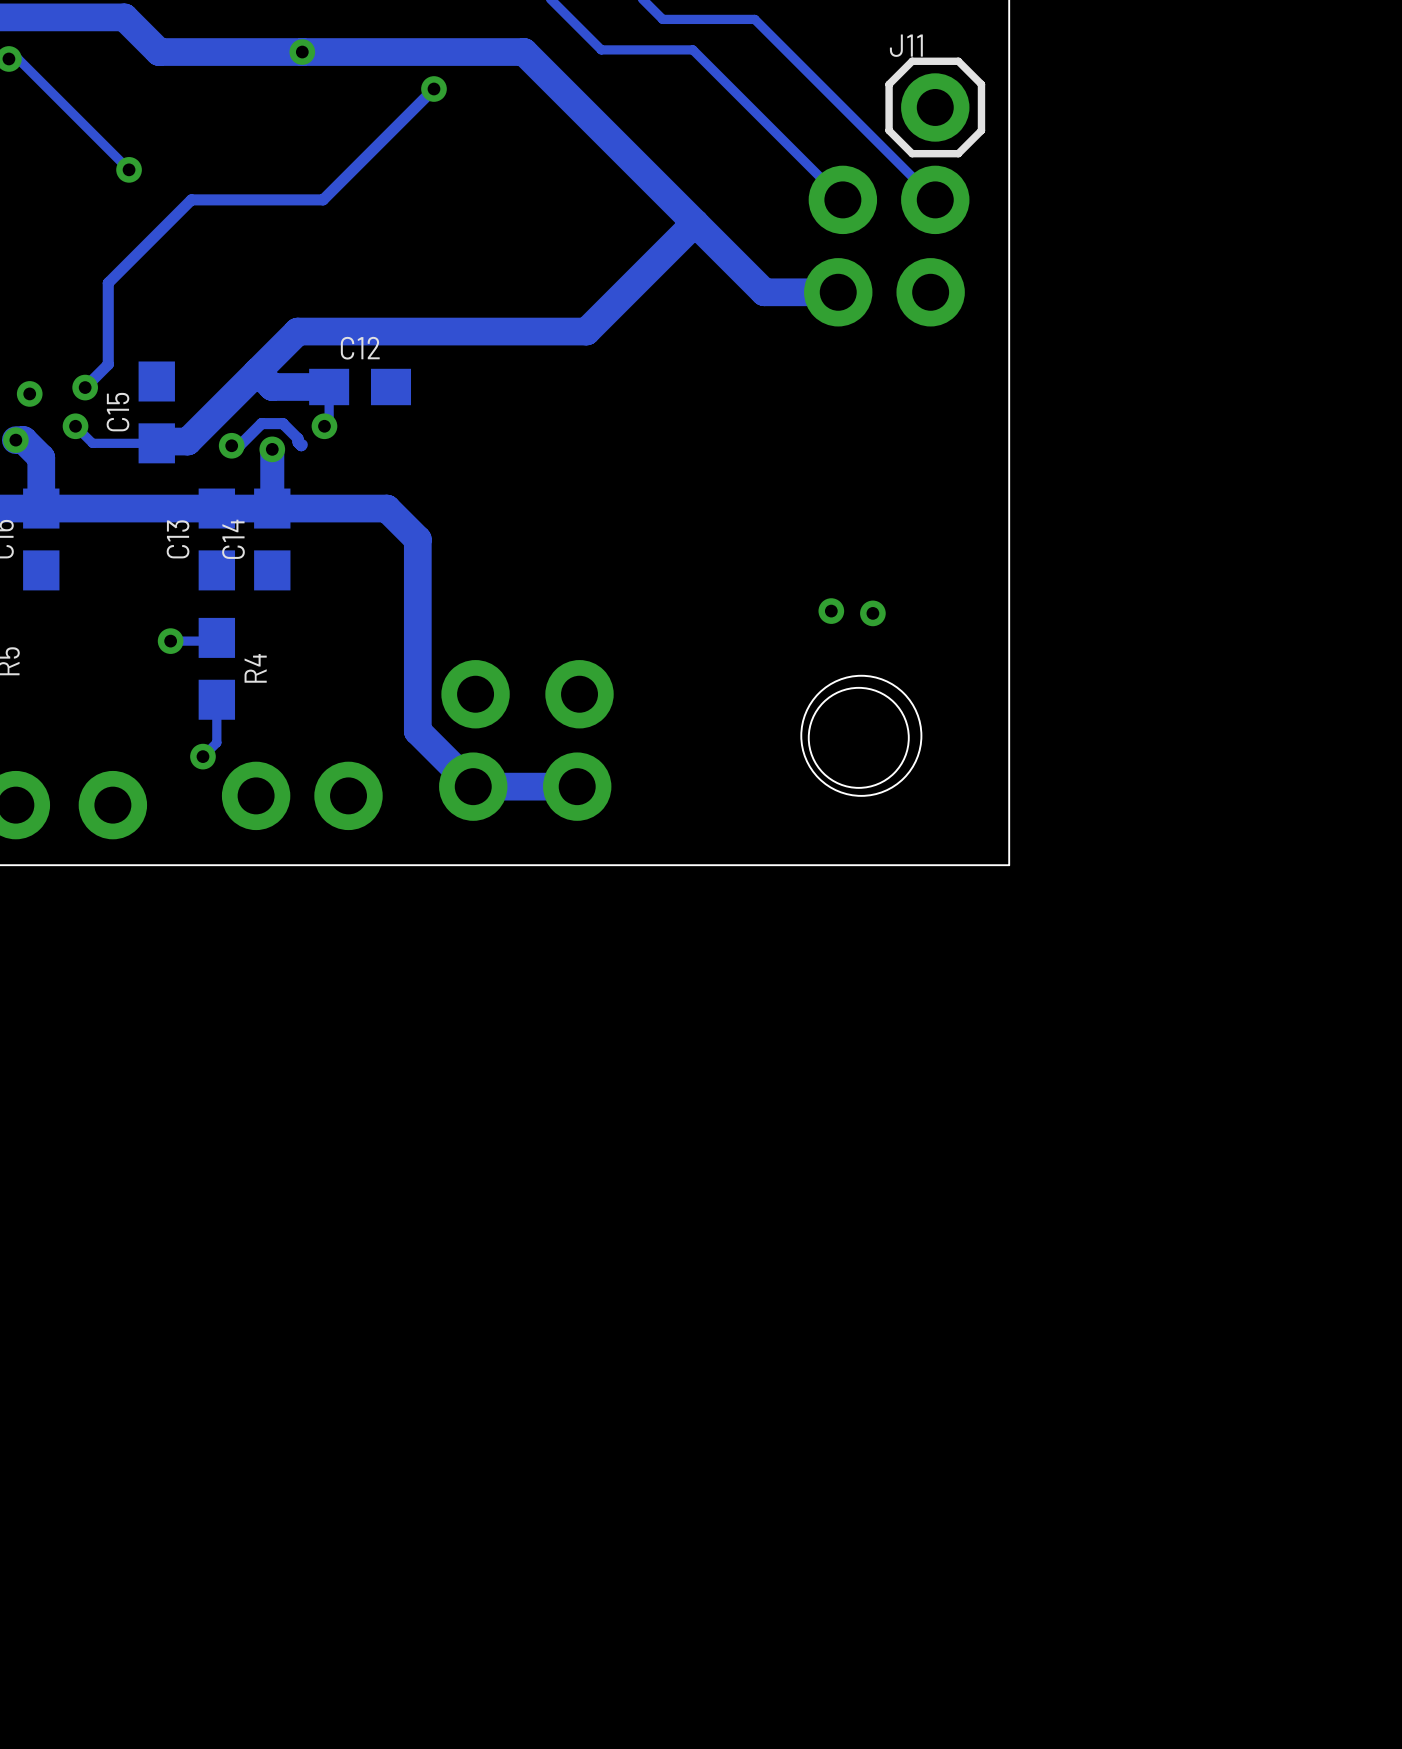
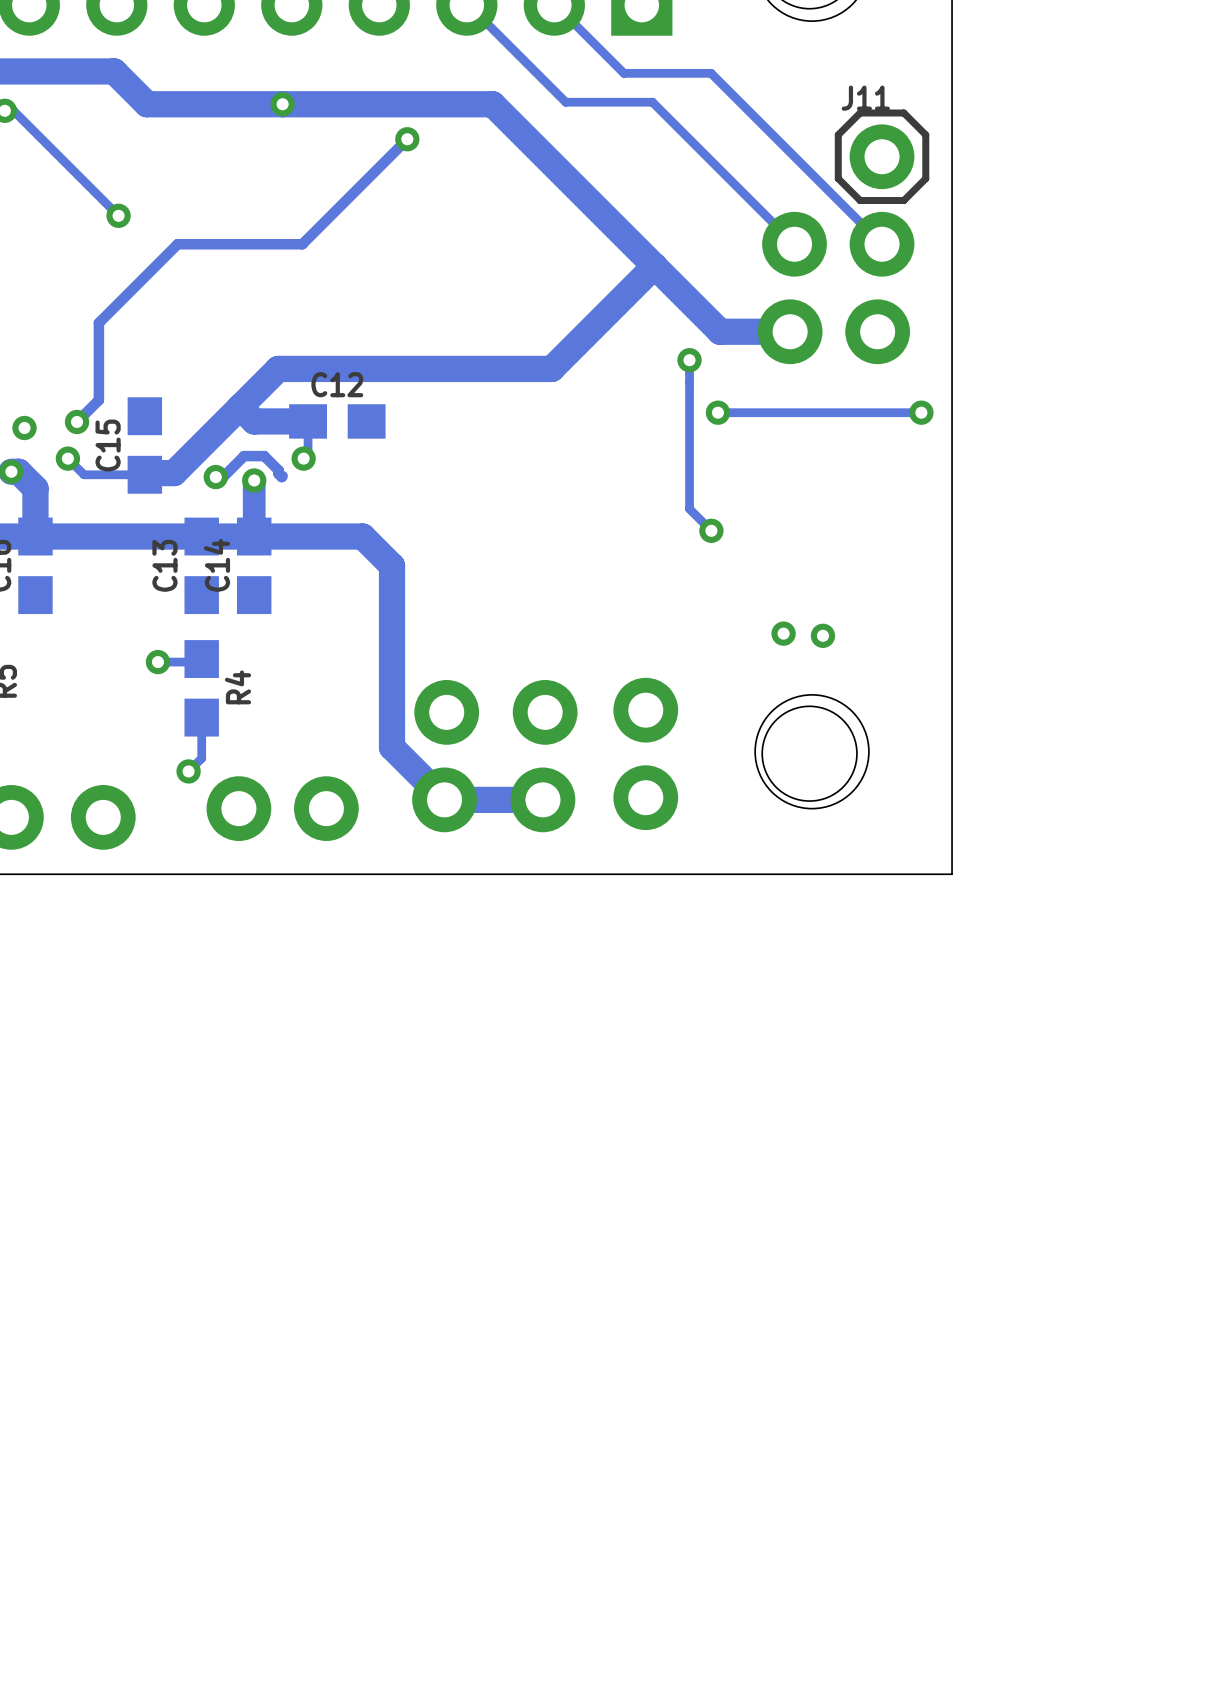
track: none -> (689, 360) (689, 508) (711, 530)
via: none -> (689, 360)
via: none -> (717, 412)
track: none -> (921, 412) (717, 412)
via: none -> (921, 412)
via: none -> (711, 530)
part: none -> (645, 710)
part: none -> (645, 797)

